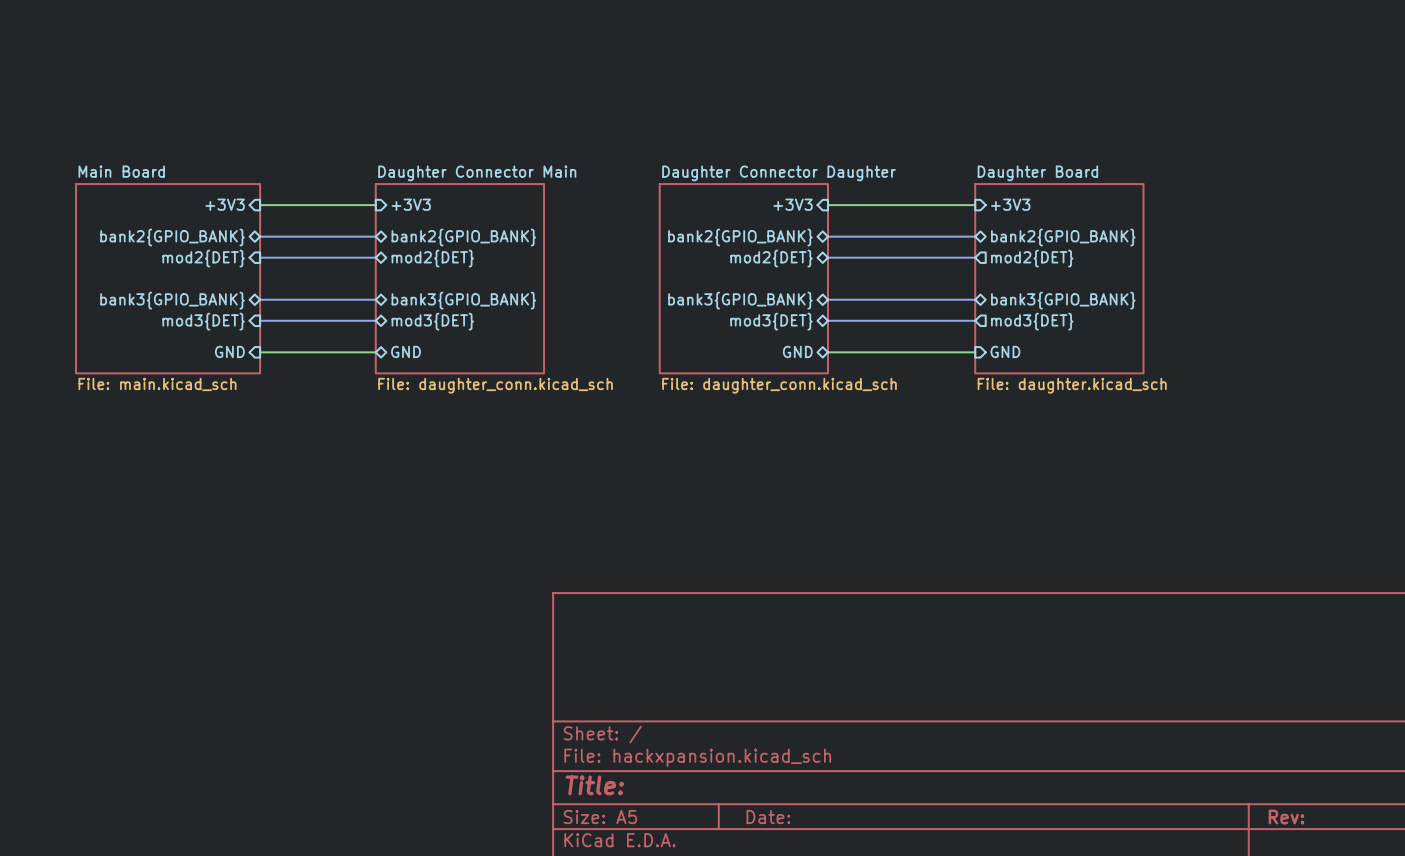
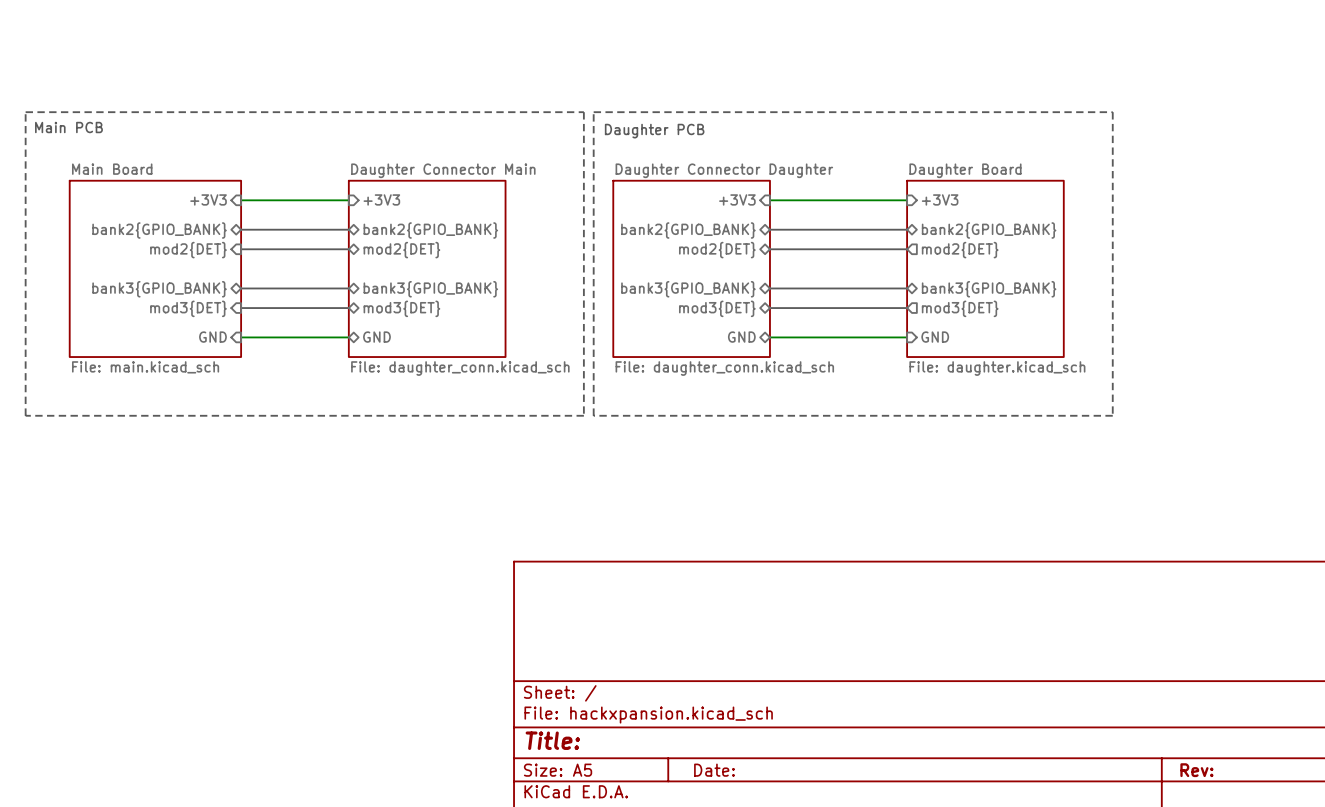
line: none -> (25, 112) (583, 112) (583, 415) (25, 415) (25, 112)
line: none -> (593, 112) (1112, 112) (1112, 415) (593, 415) (593, 112)
text: none -> Main PCB (68, 127)
text: none -> Daughter PCB (654, 131)

